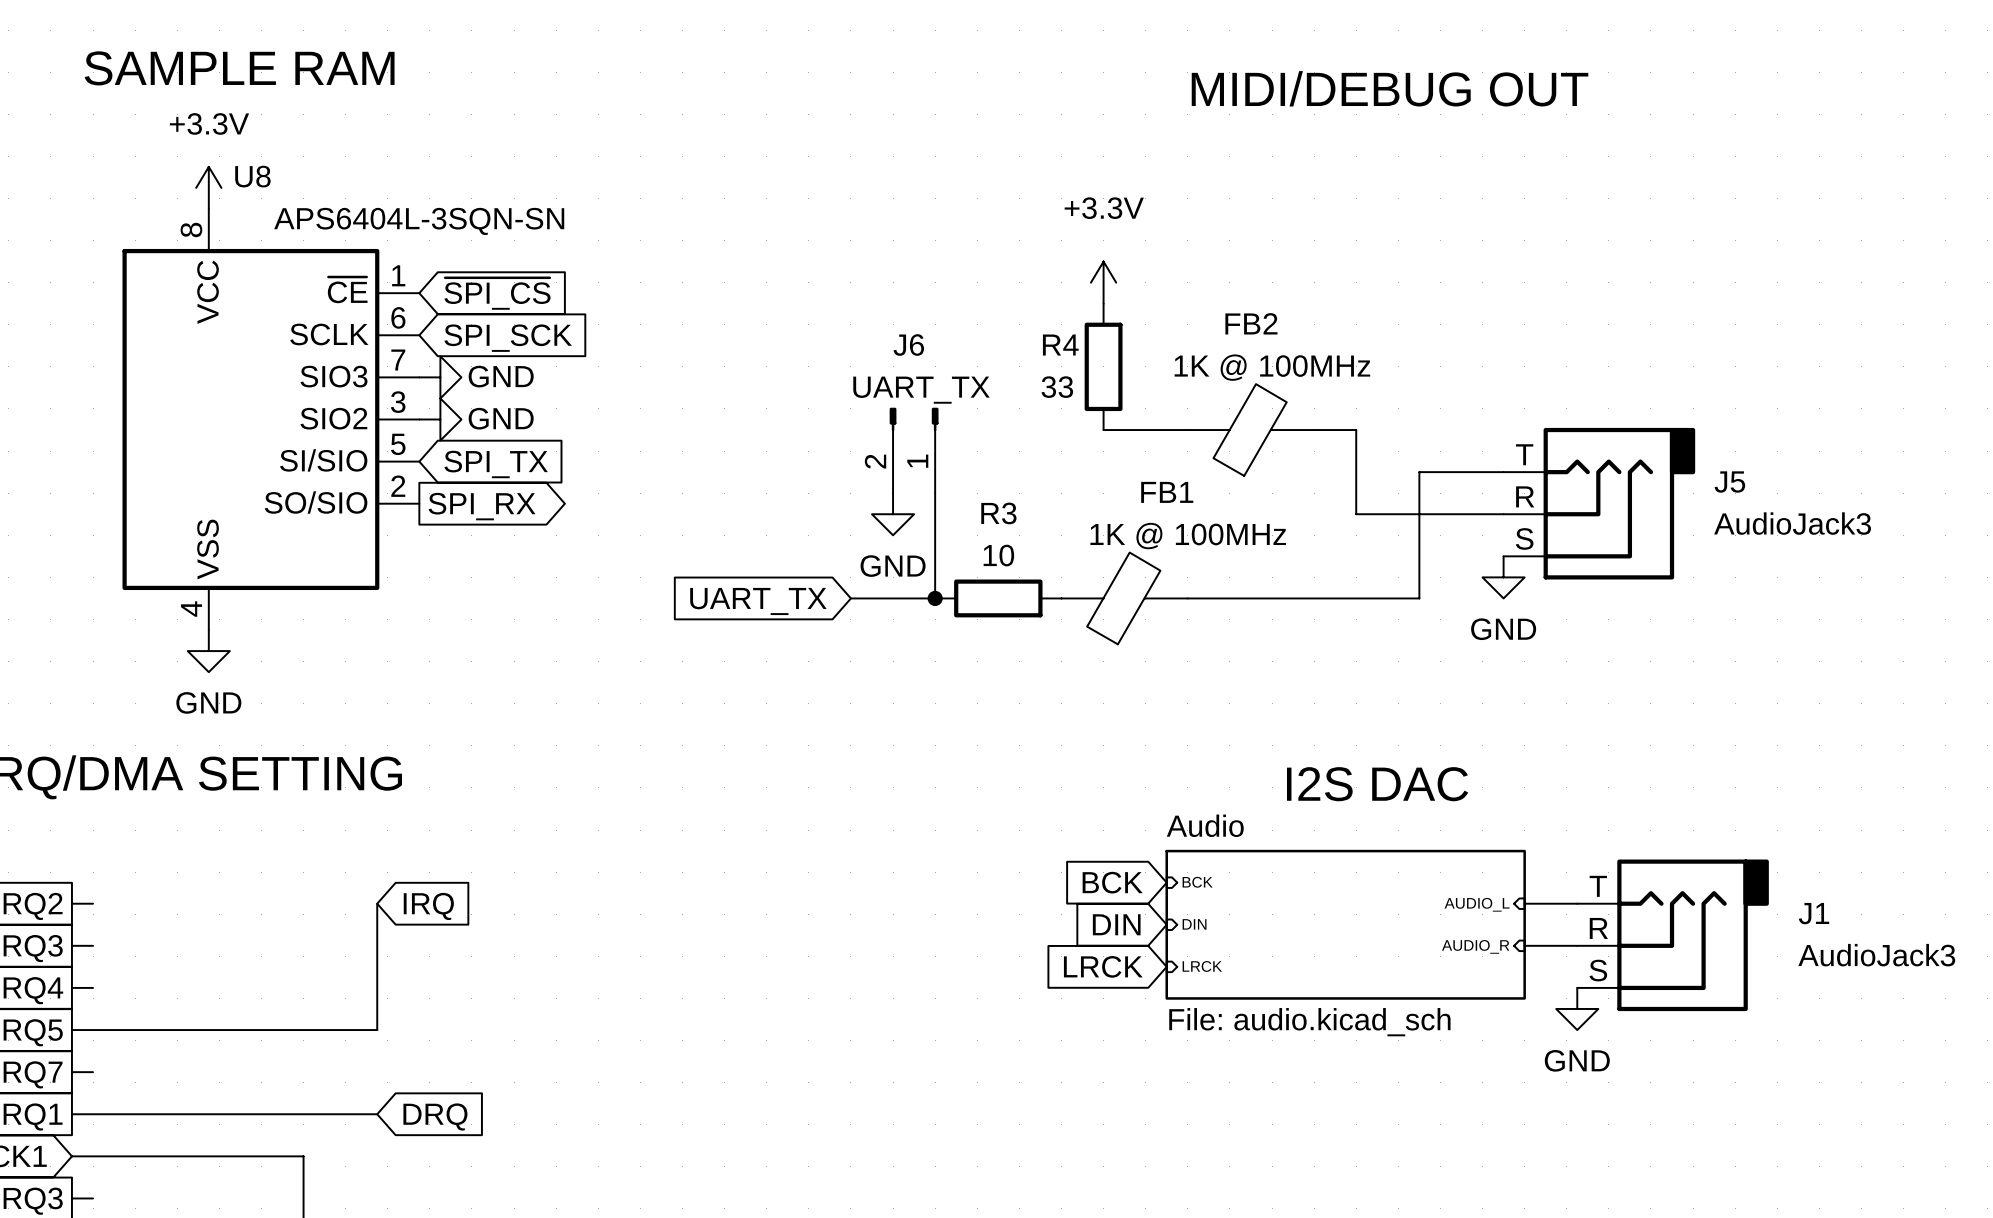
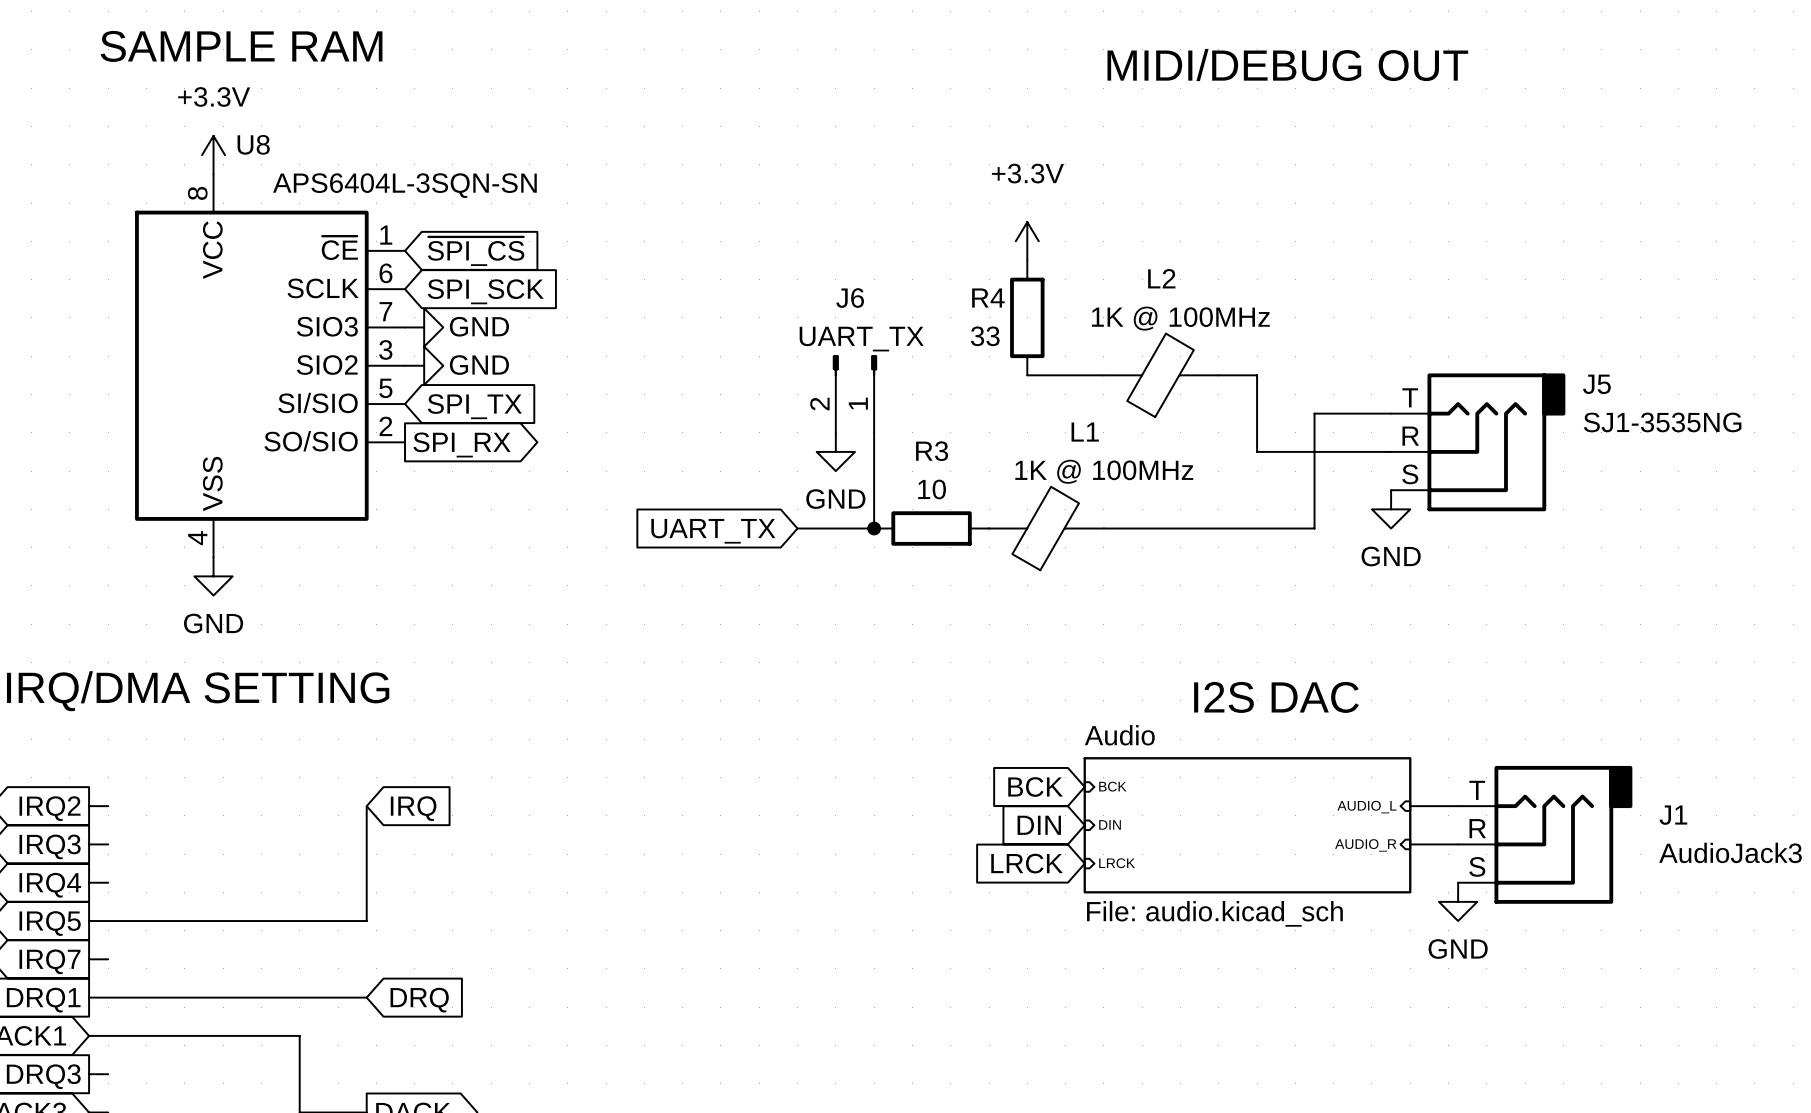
FB2 name: FB2 (1251, 323) -> L2 (1161, 278)
J5 name position: J5 (1729, 482) -> J5 (1596, 384)
FB1 name: FB1 (1167, 492) -> L1 (1085, 432)
J5 value: AudioJack3 (1792, 523) -> SJ1-3535NG (1662, 422)

